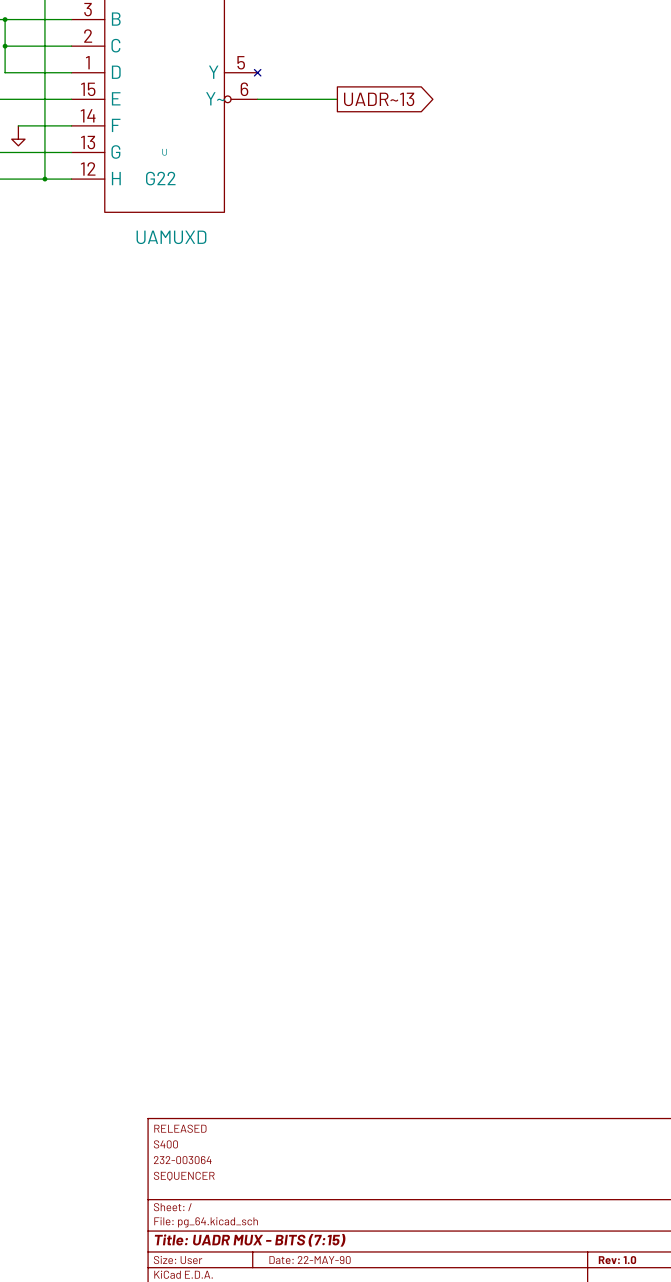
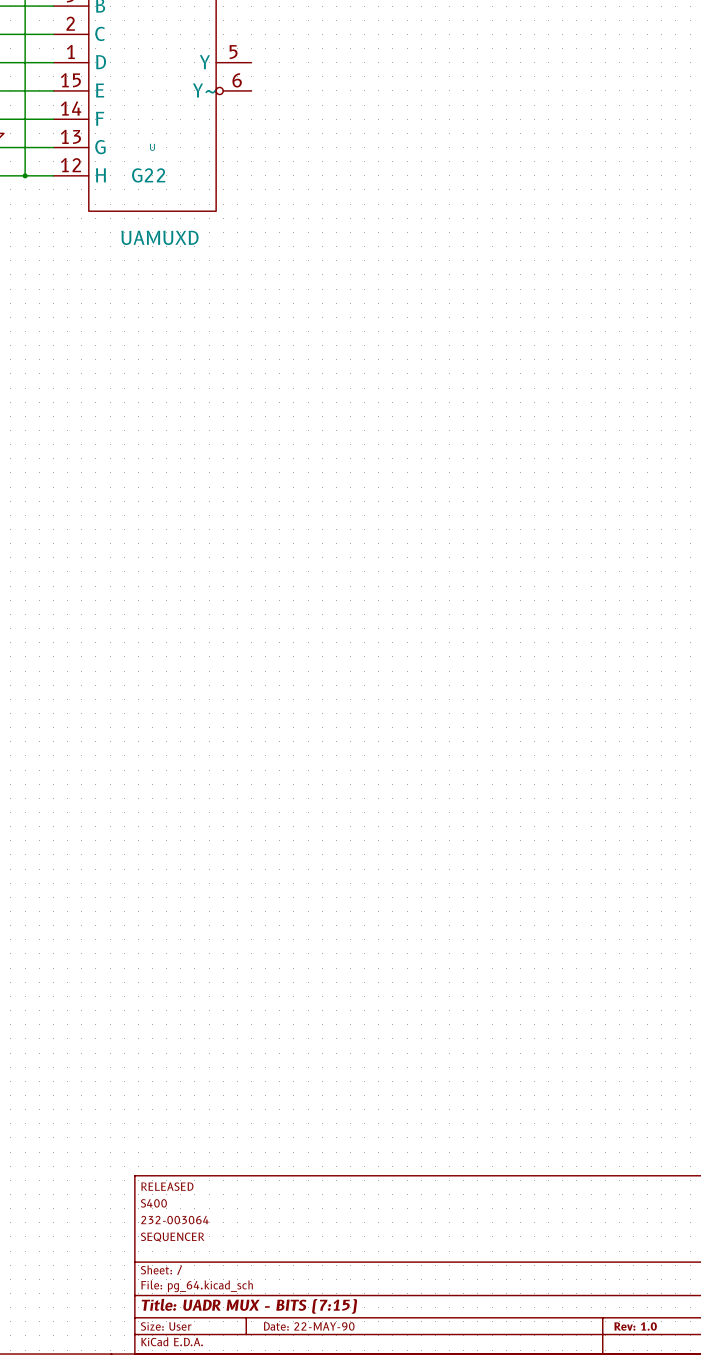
no-connect mark: (257, 72) -> none
wire: (257, 99) (337, 99) -> none
global label: UADR~13 (379, 99) -> none

